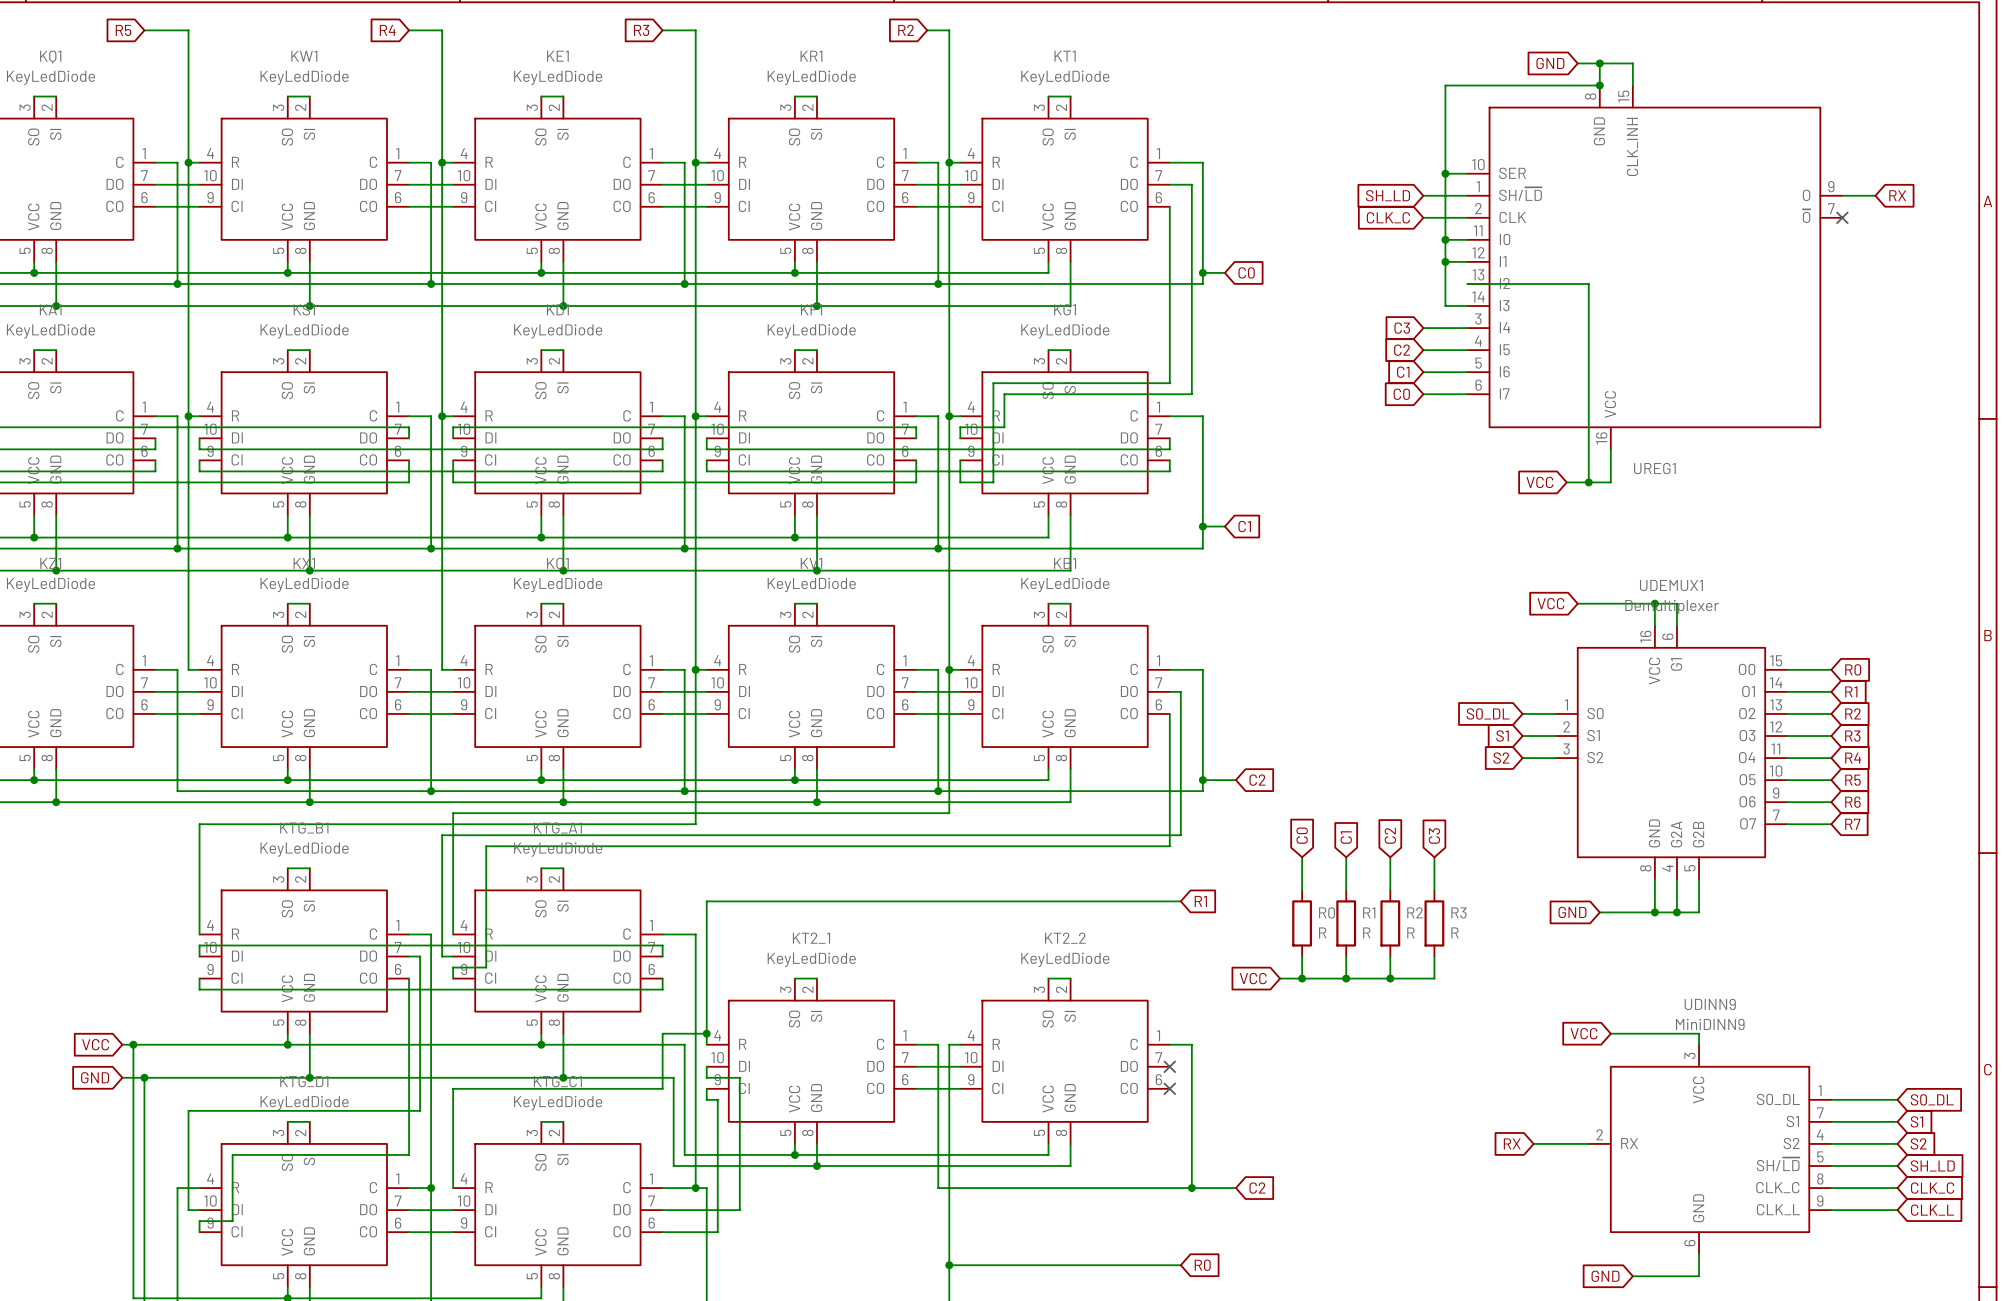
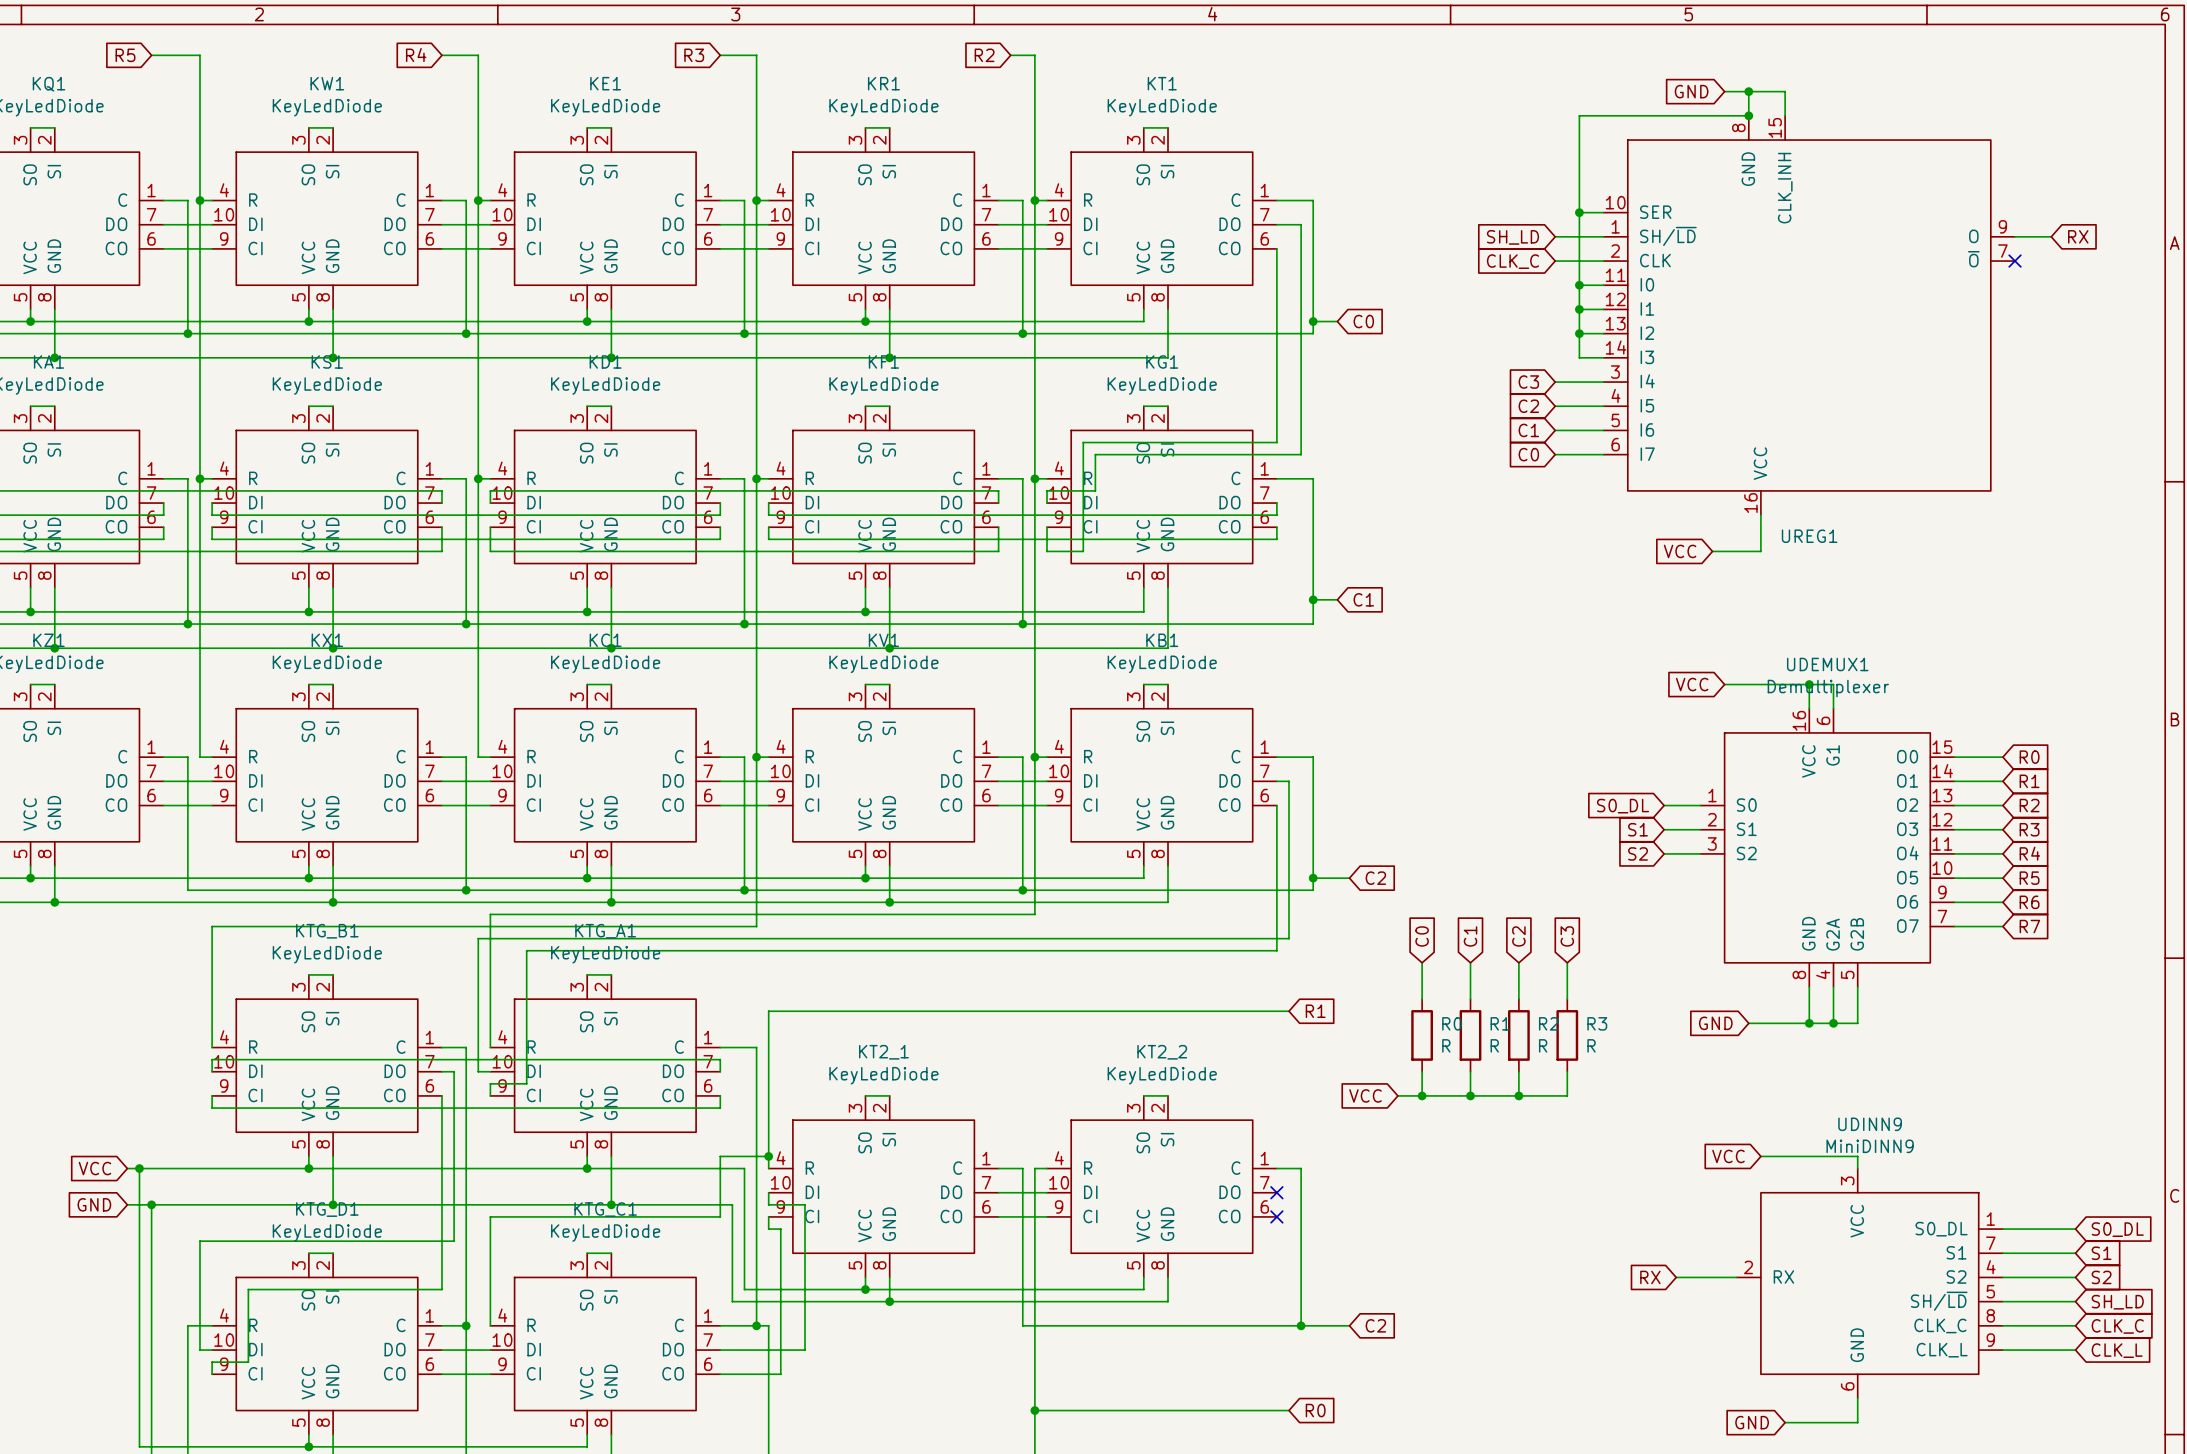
junction: none -> (1579, 333)
wire: (1467, 283) (1588, 283) (1588, 482) -> (1603, 333) (1579, 333)
junction: (1588, 482) -> none

